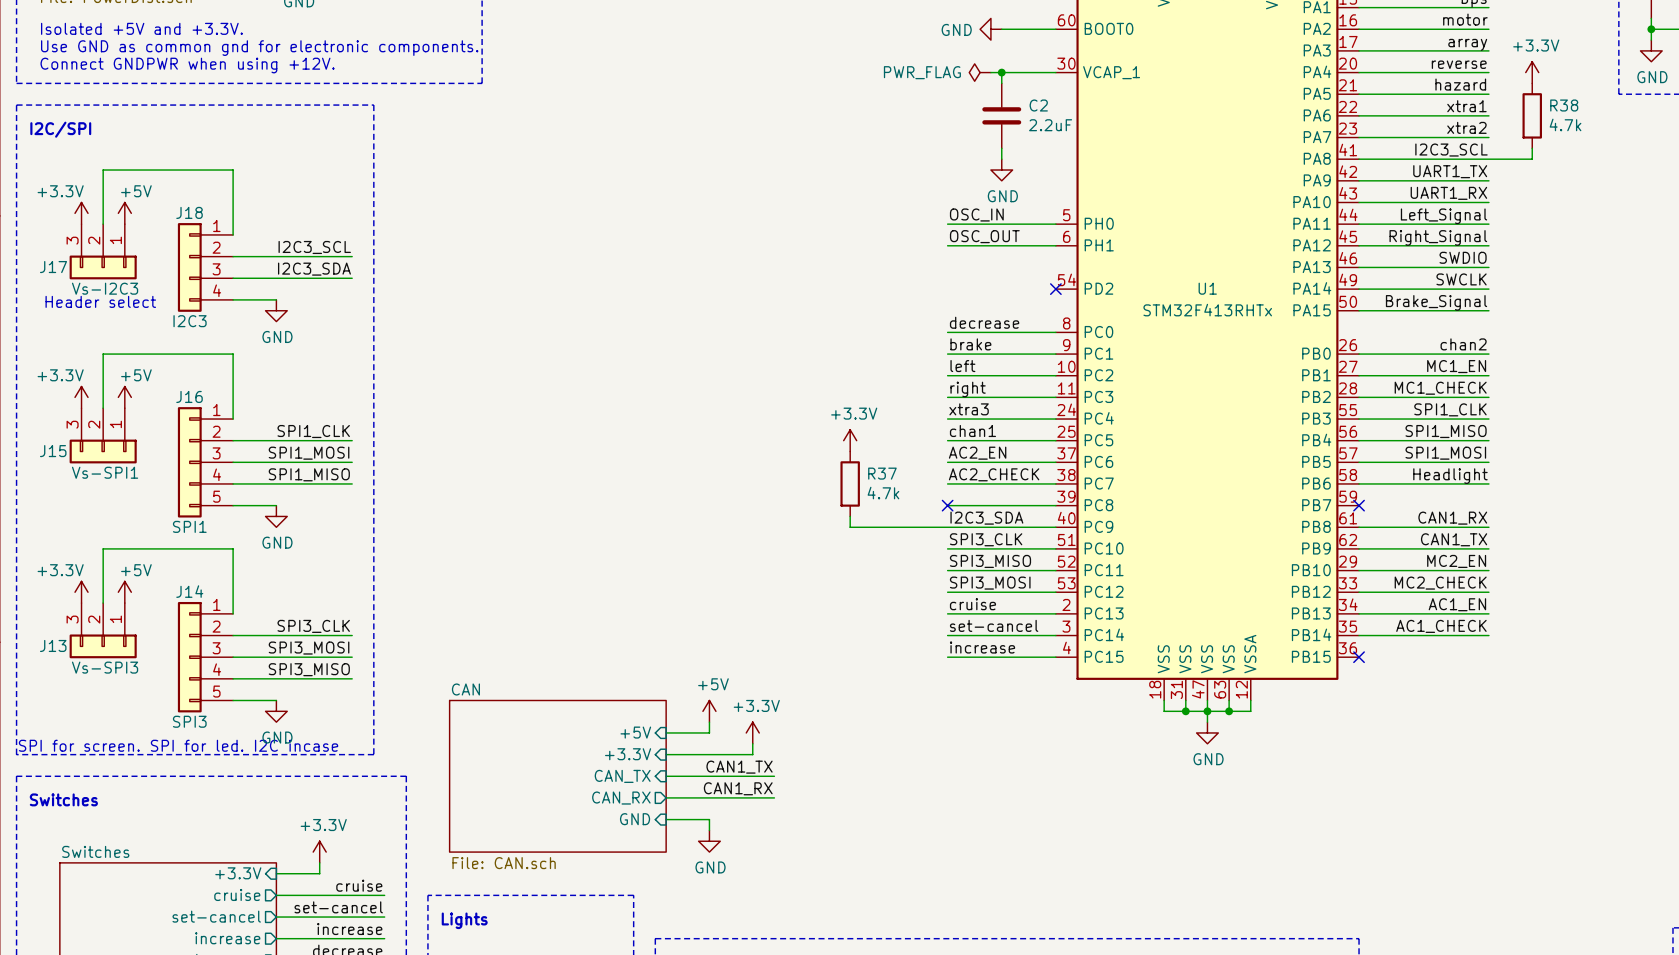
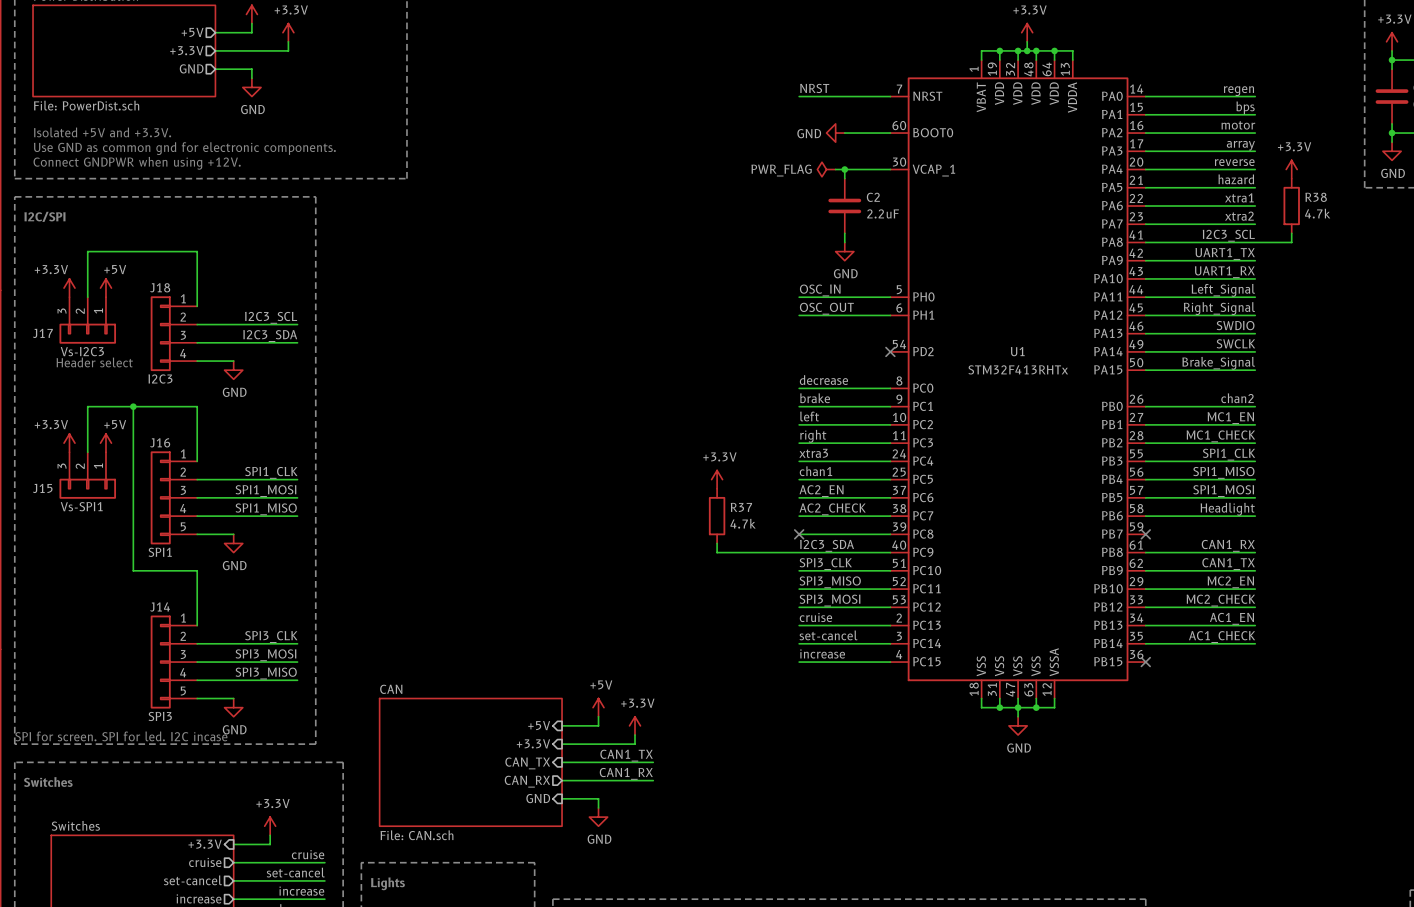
junction: none -> (133, 406)
wire: (157, 548) (103, 548) (103, 603) -> (133, 570) (133, 406)
power symbol: +3.3V (81, 592) -> none
power symbol: +5V (124, 592) -> none
J13: Vs-SPI3 (103, 630) -> none

